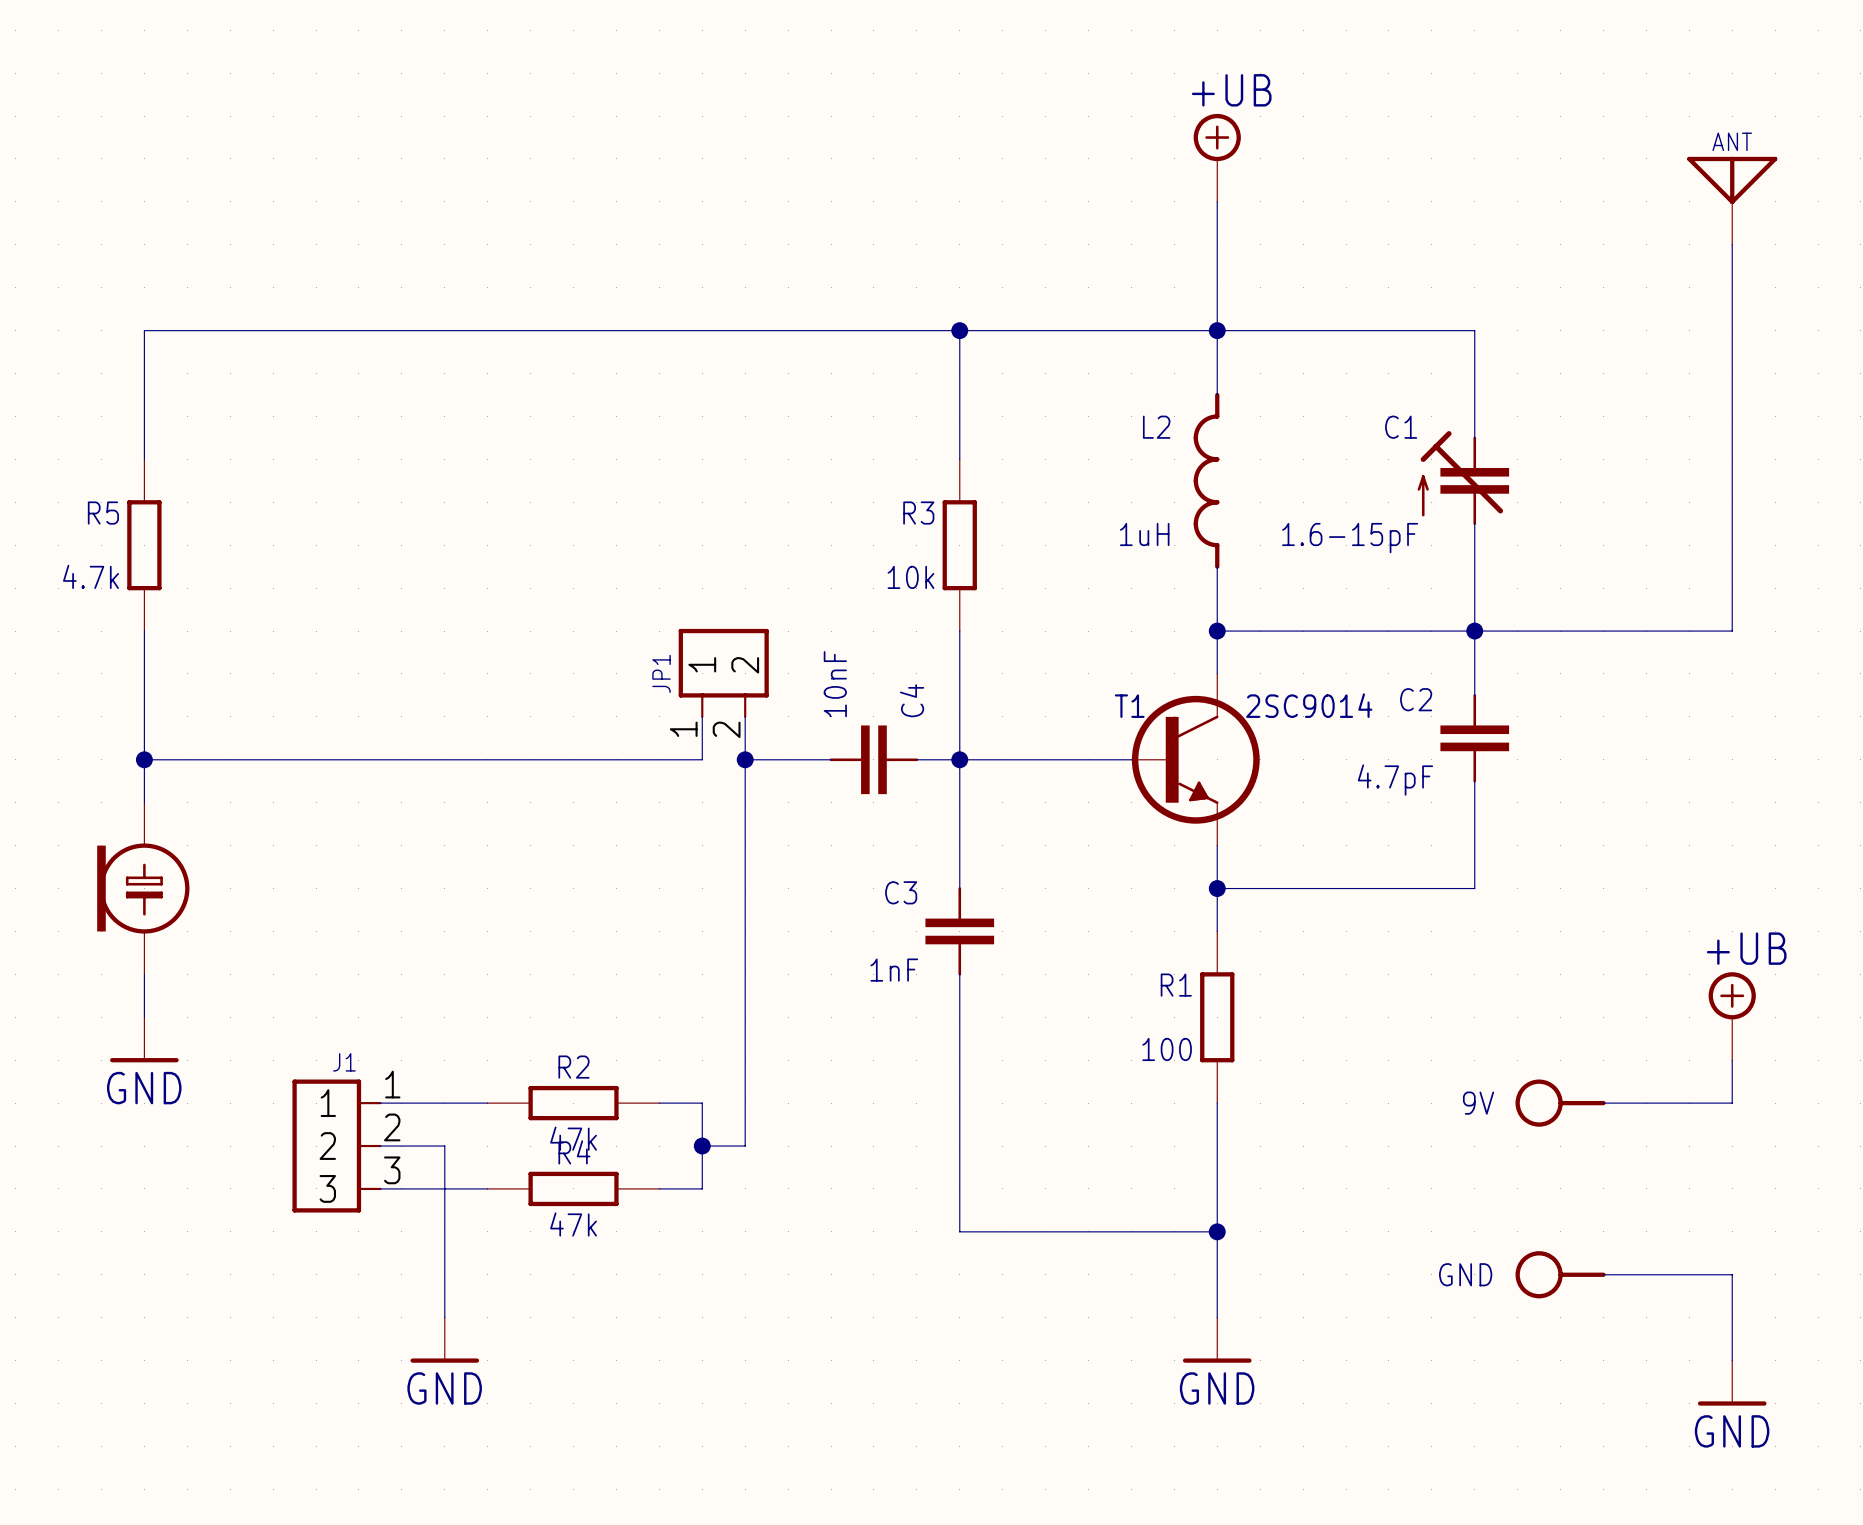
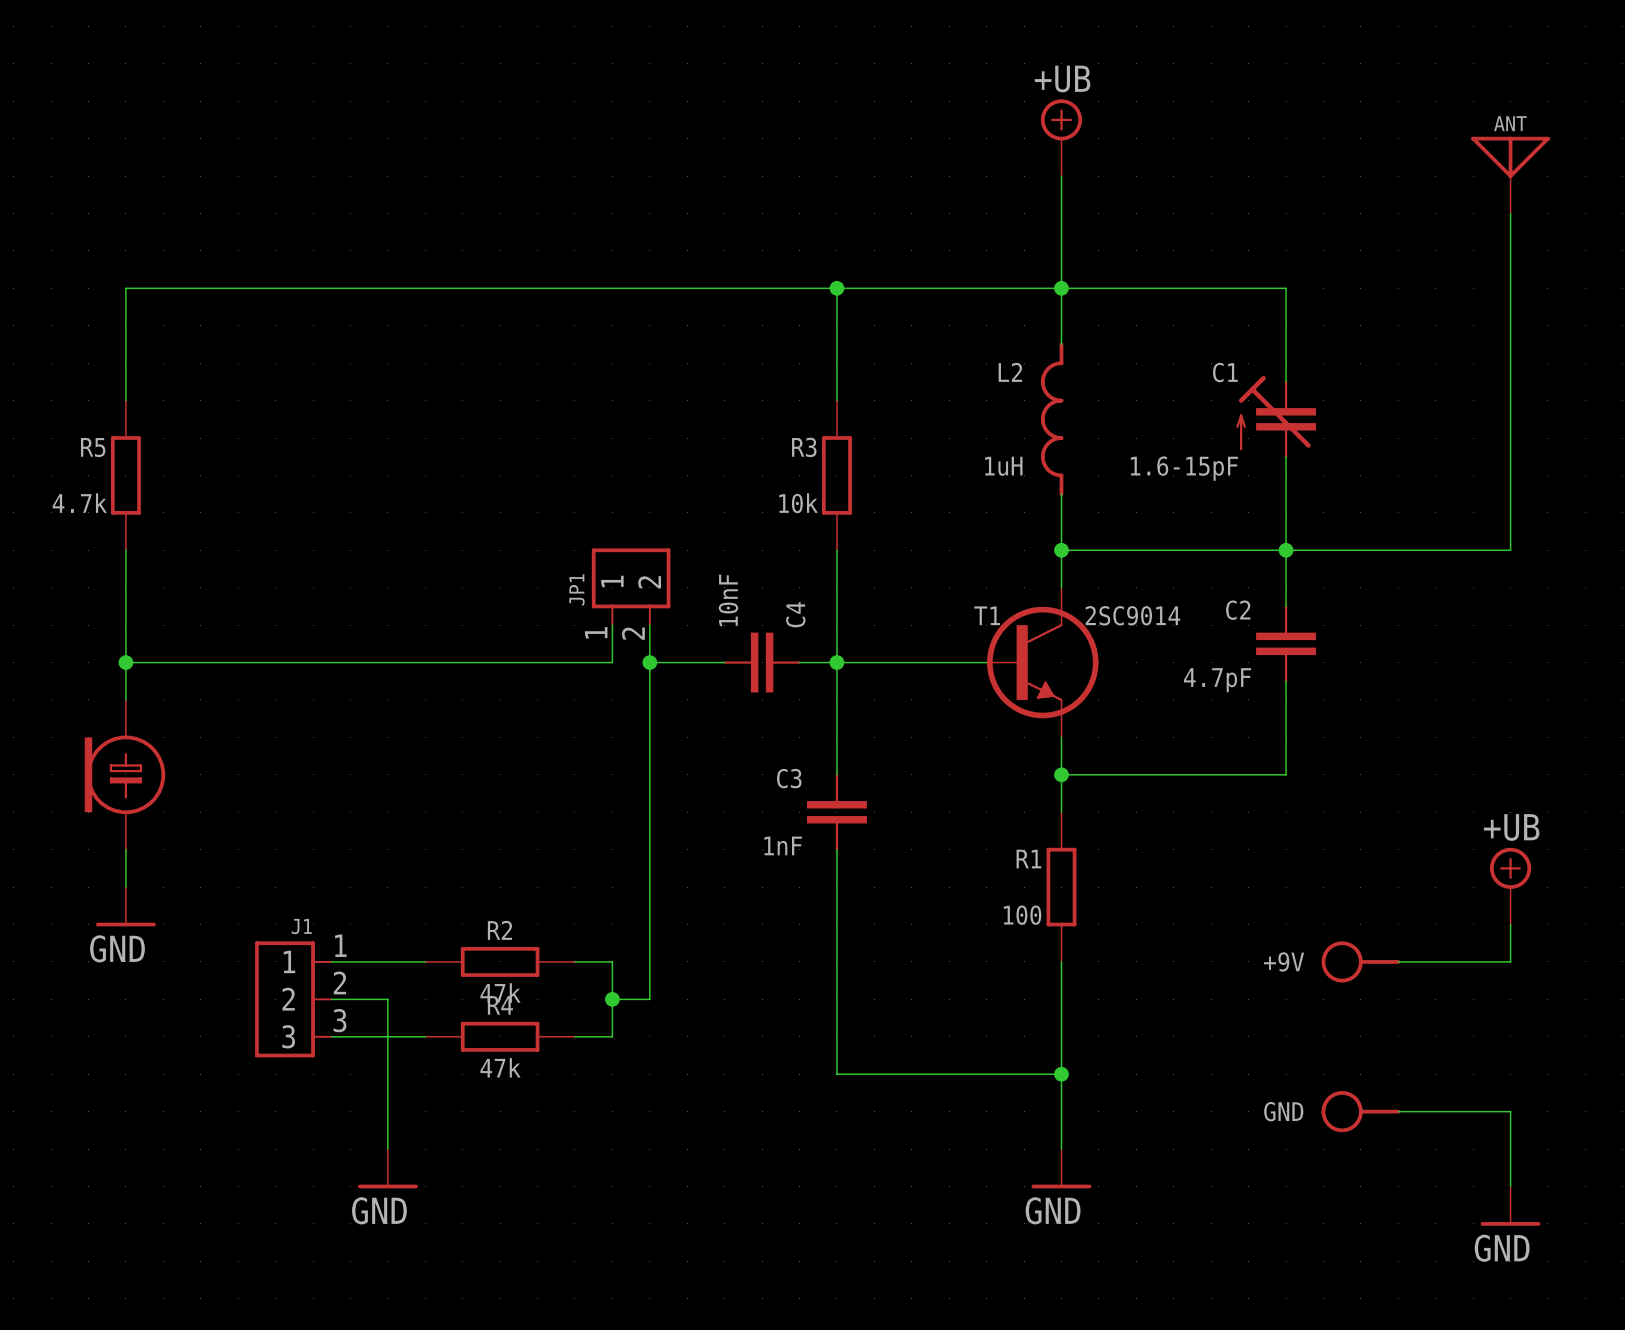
9V name: 9V (1478, 1103) -> +9V (1284, 961)

